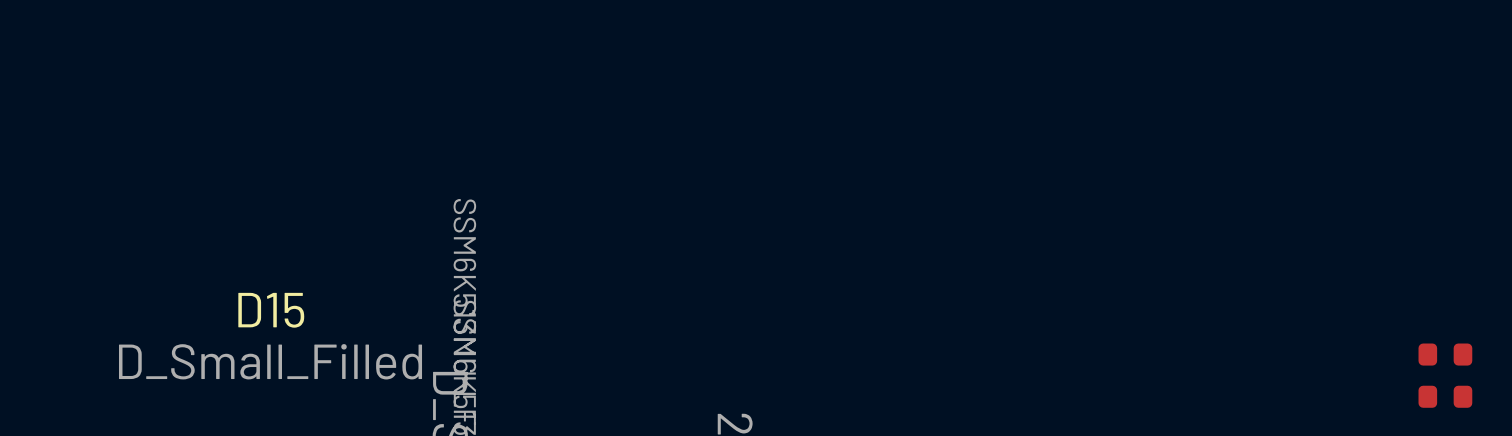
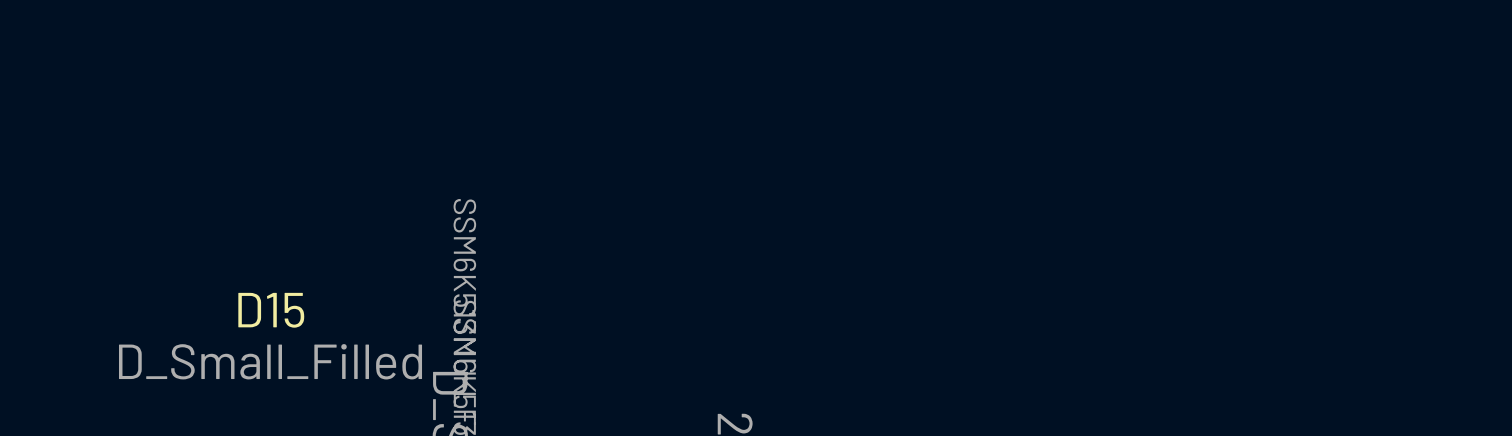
part: (1445, 354) -> none
part: (1445, 396) -> none

